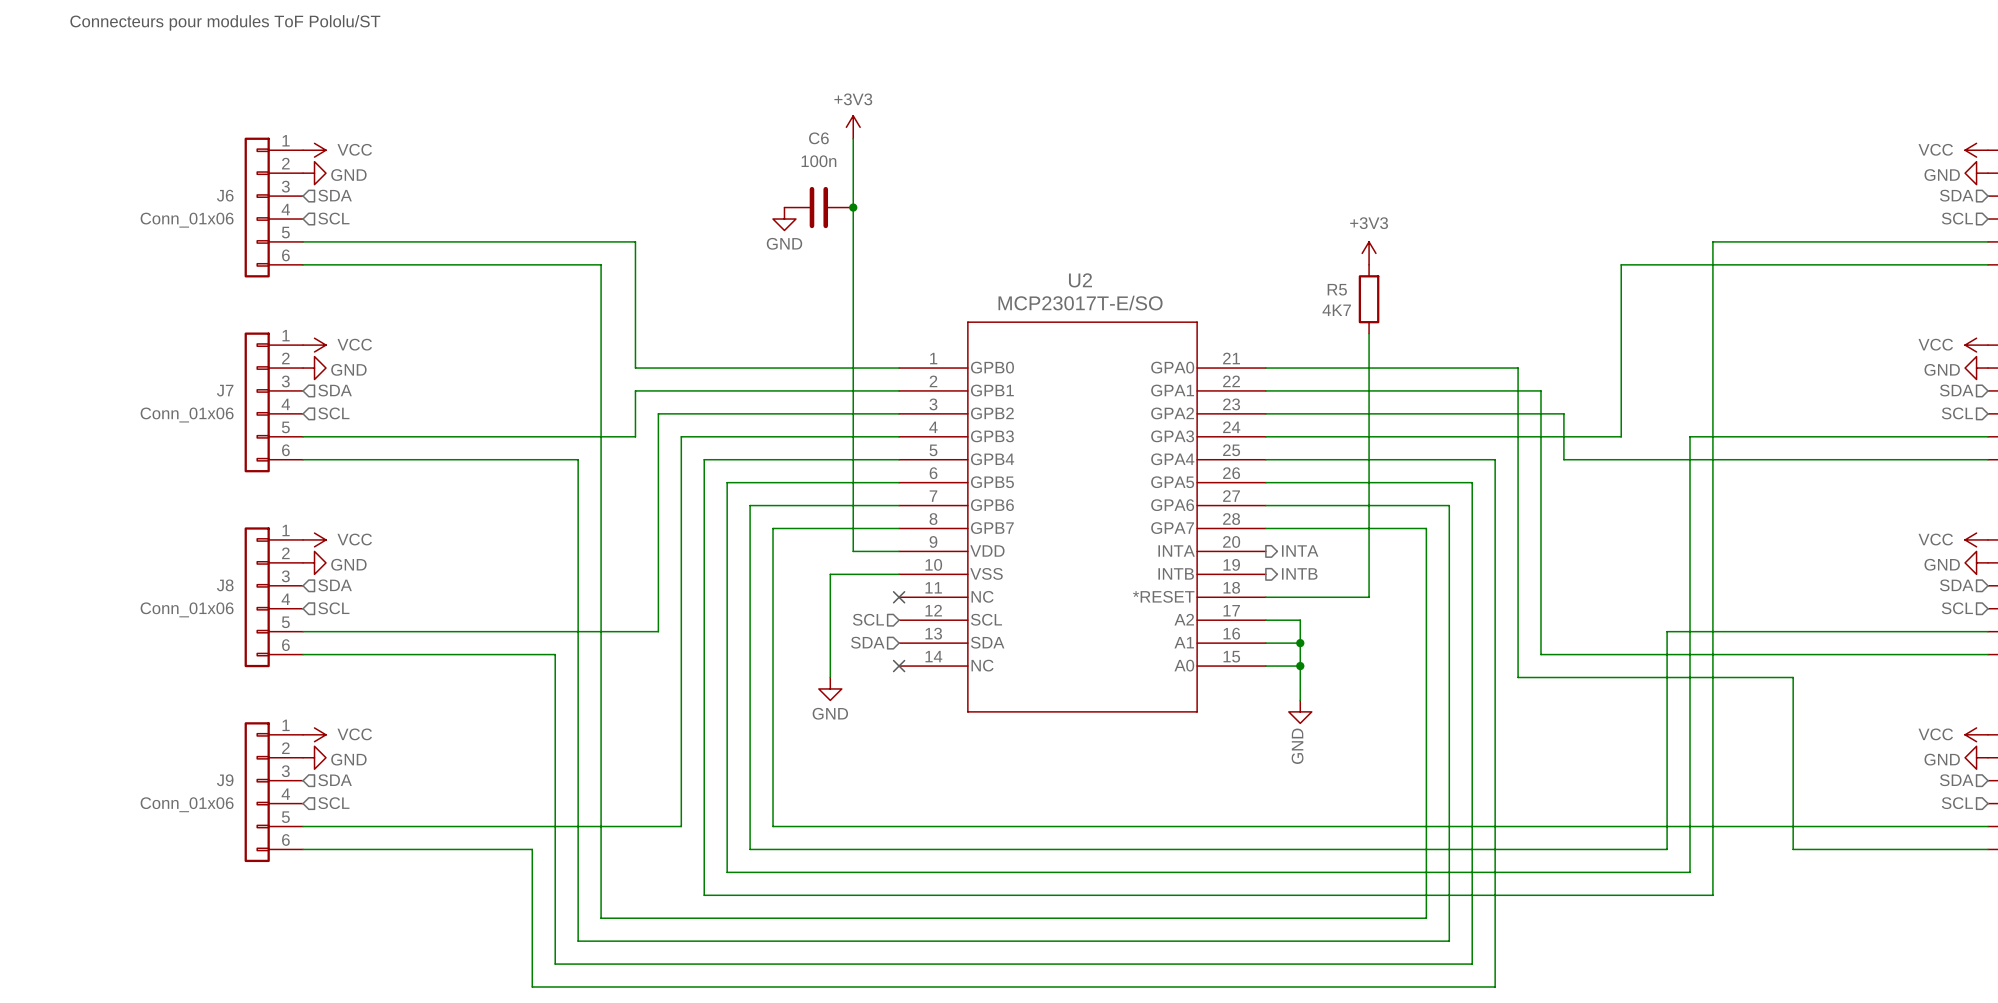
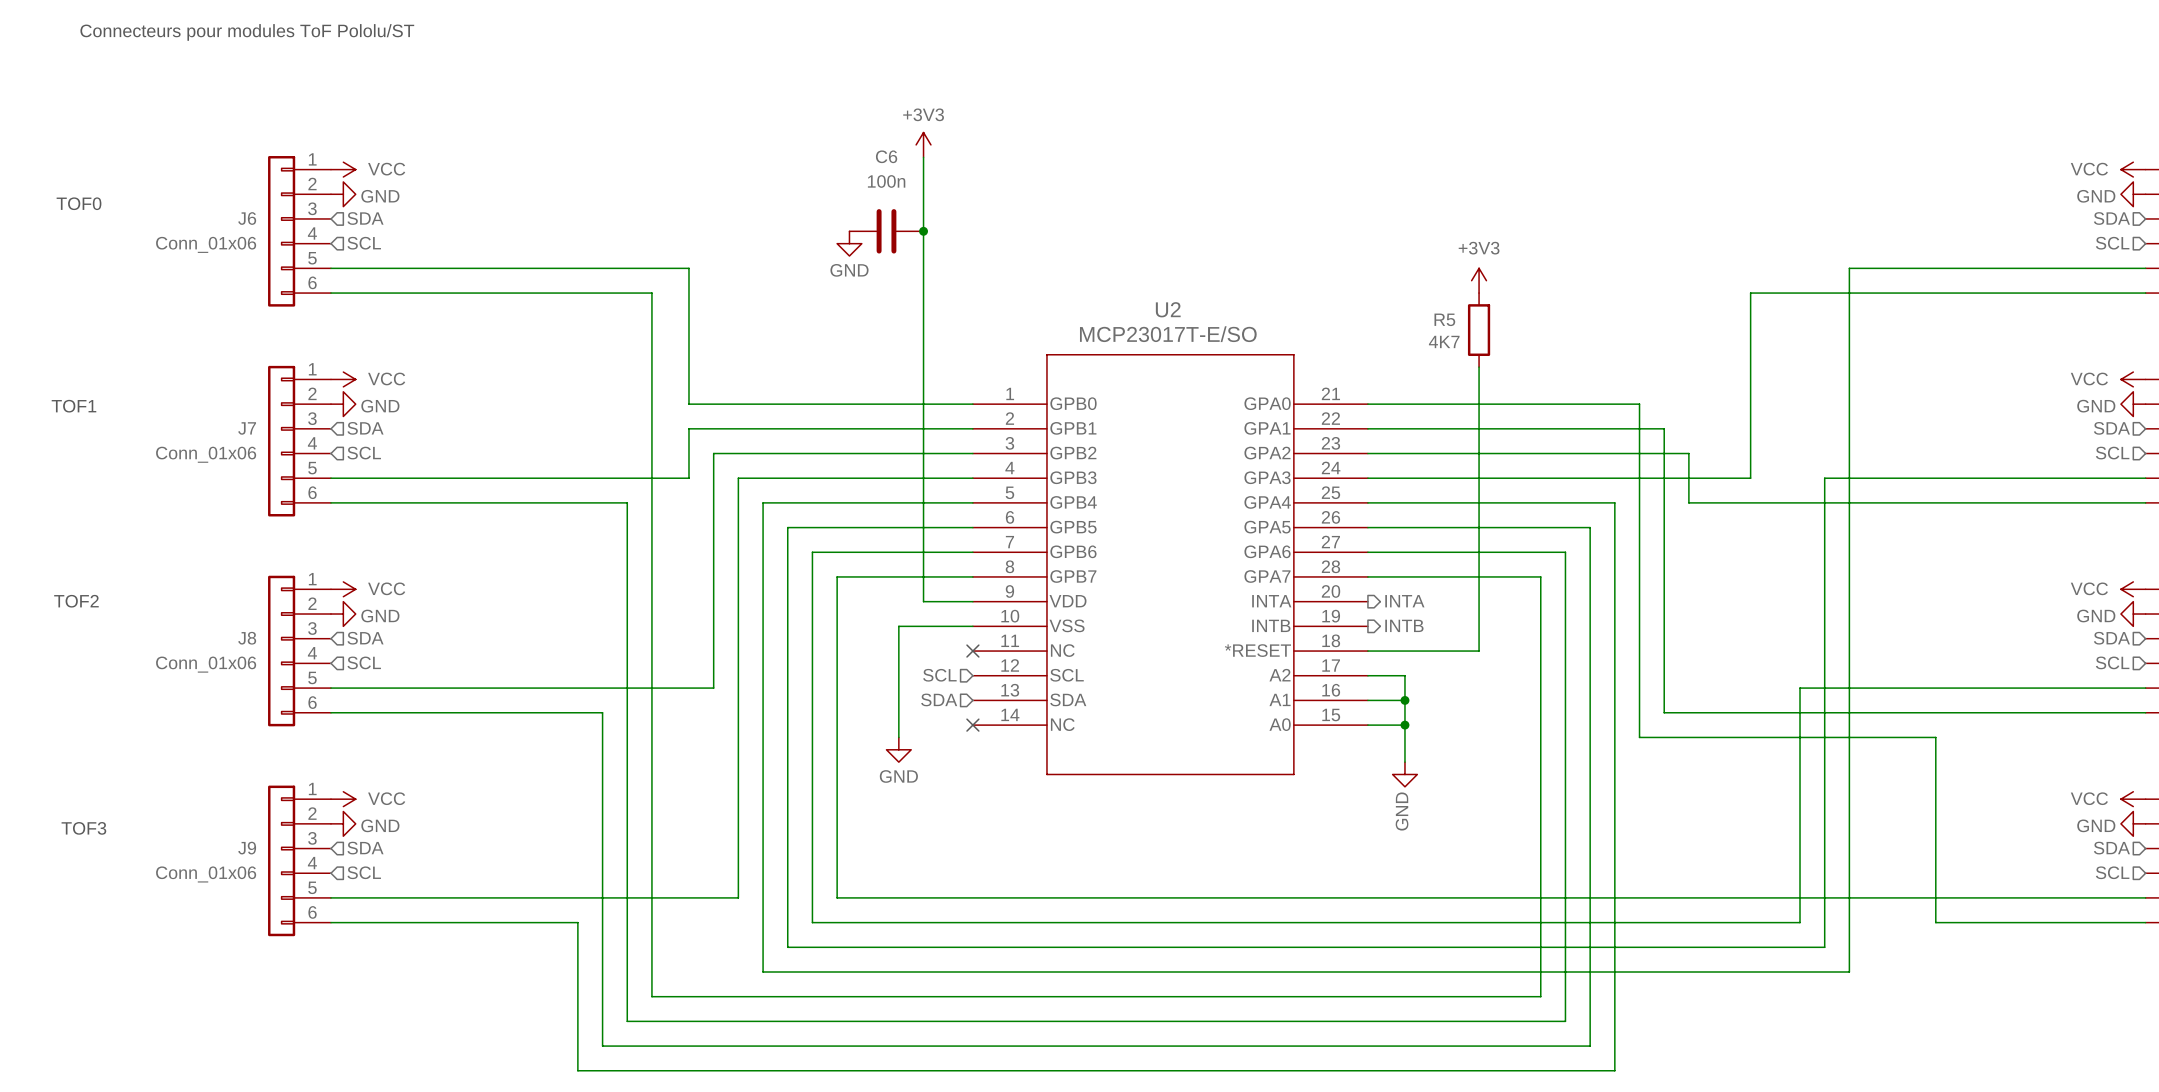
text: none -> TOF0 (79, 203)
text: none -> TOF1 (73, 406)
text: none -> TOF2 (76, 601)
text: none -> TOF3 (83, 828)

